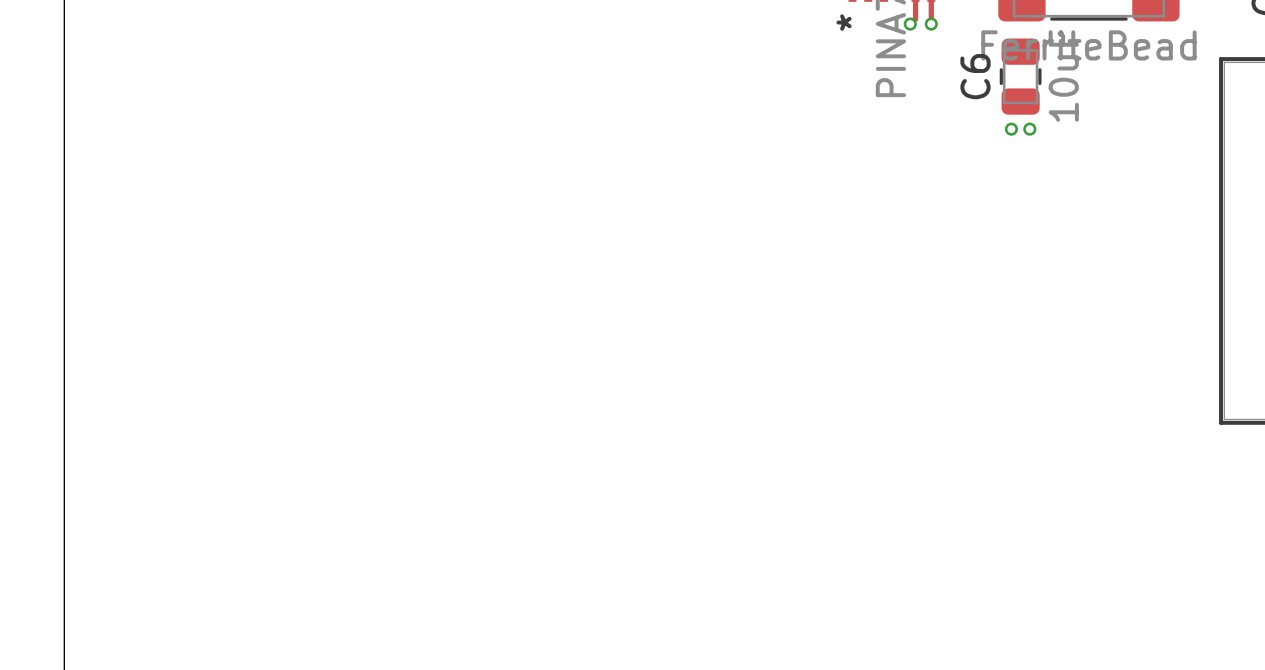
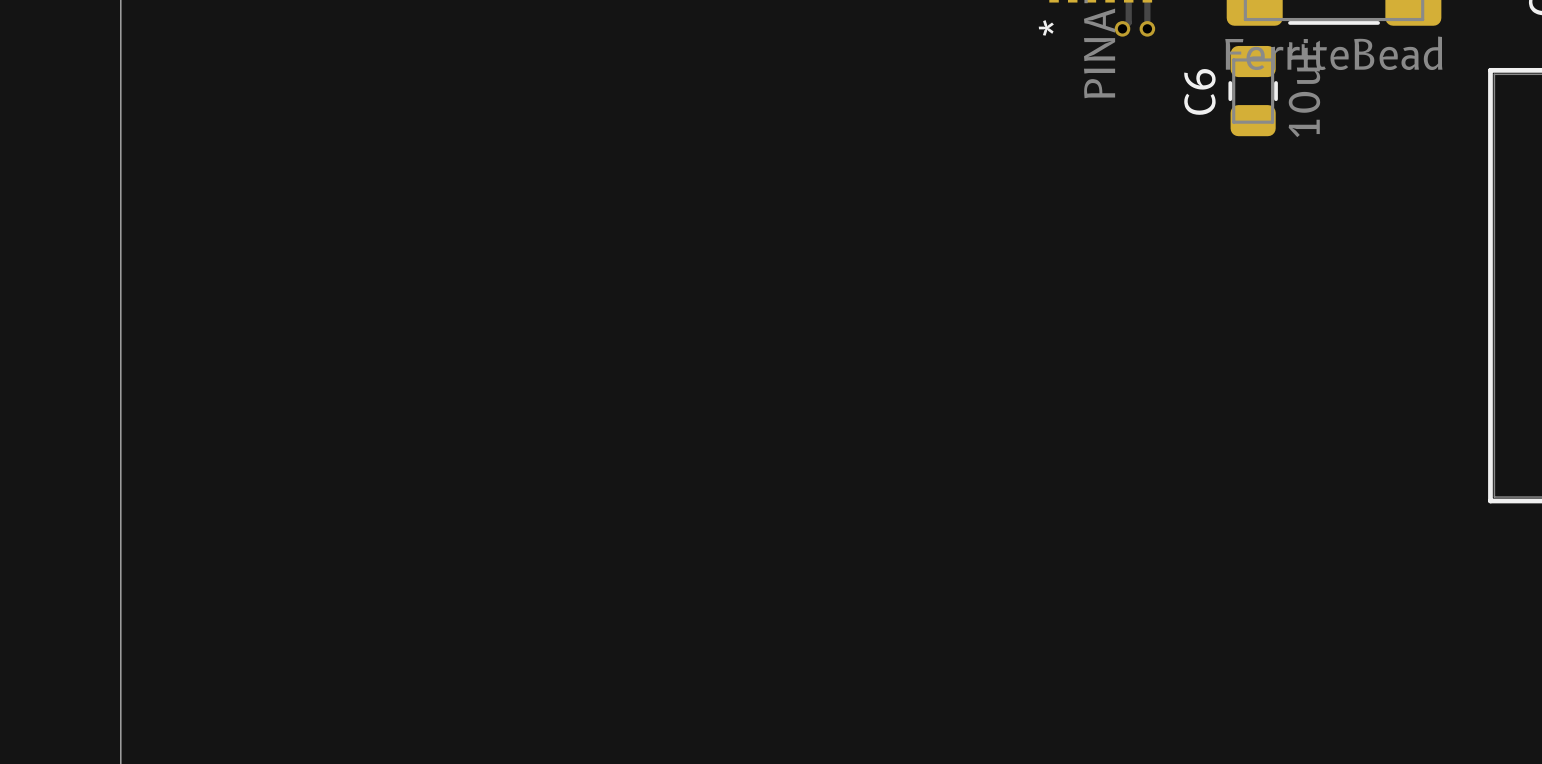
via: (1011, 129) -> none
via: (1029, 129) -> none

